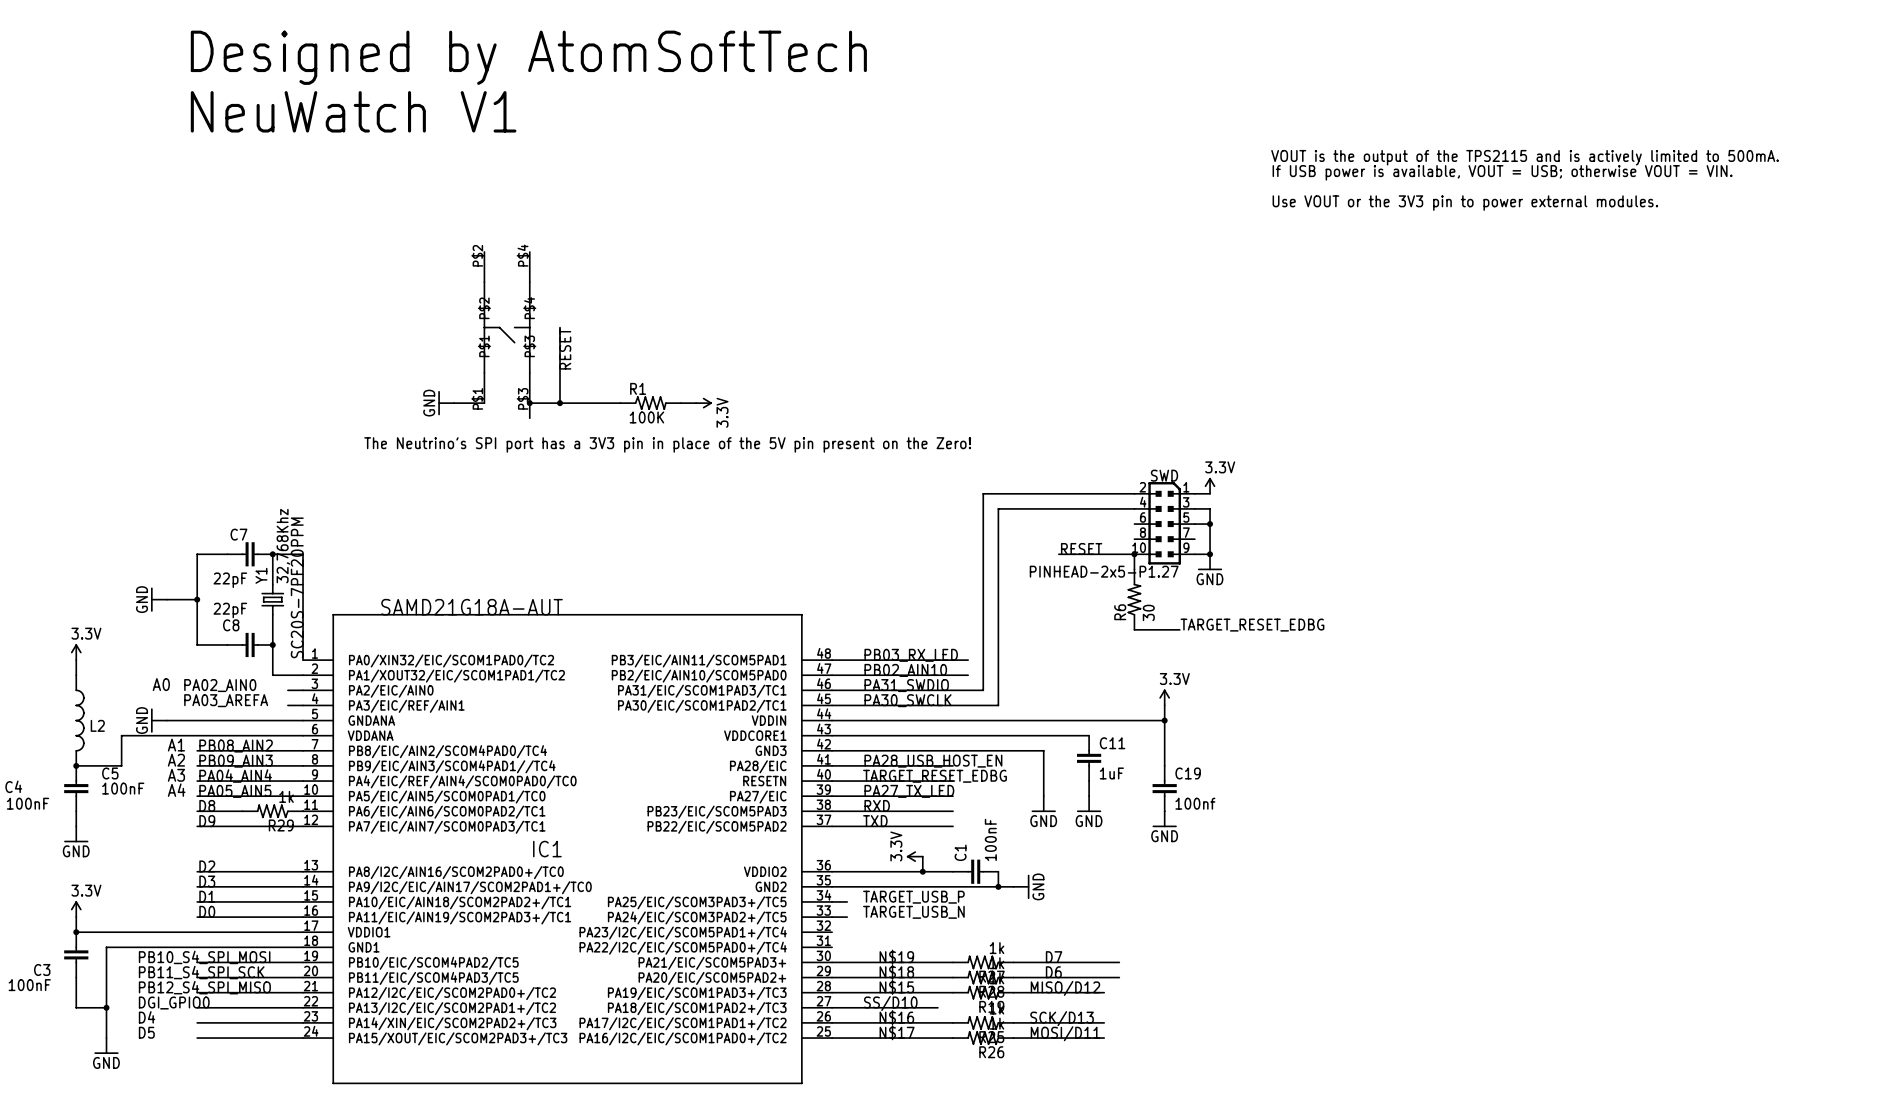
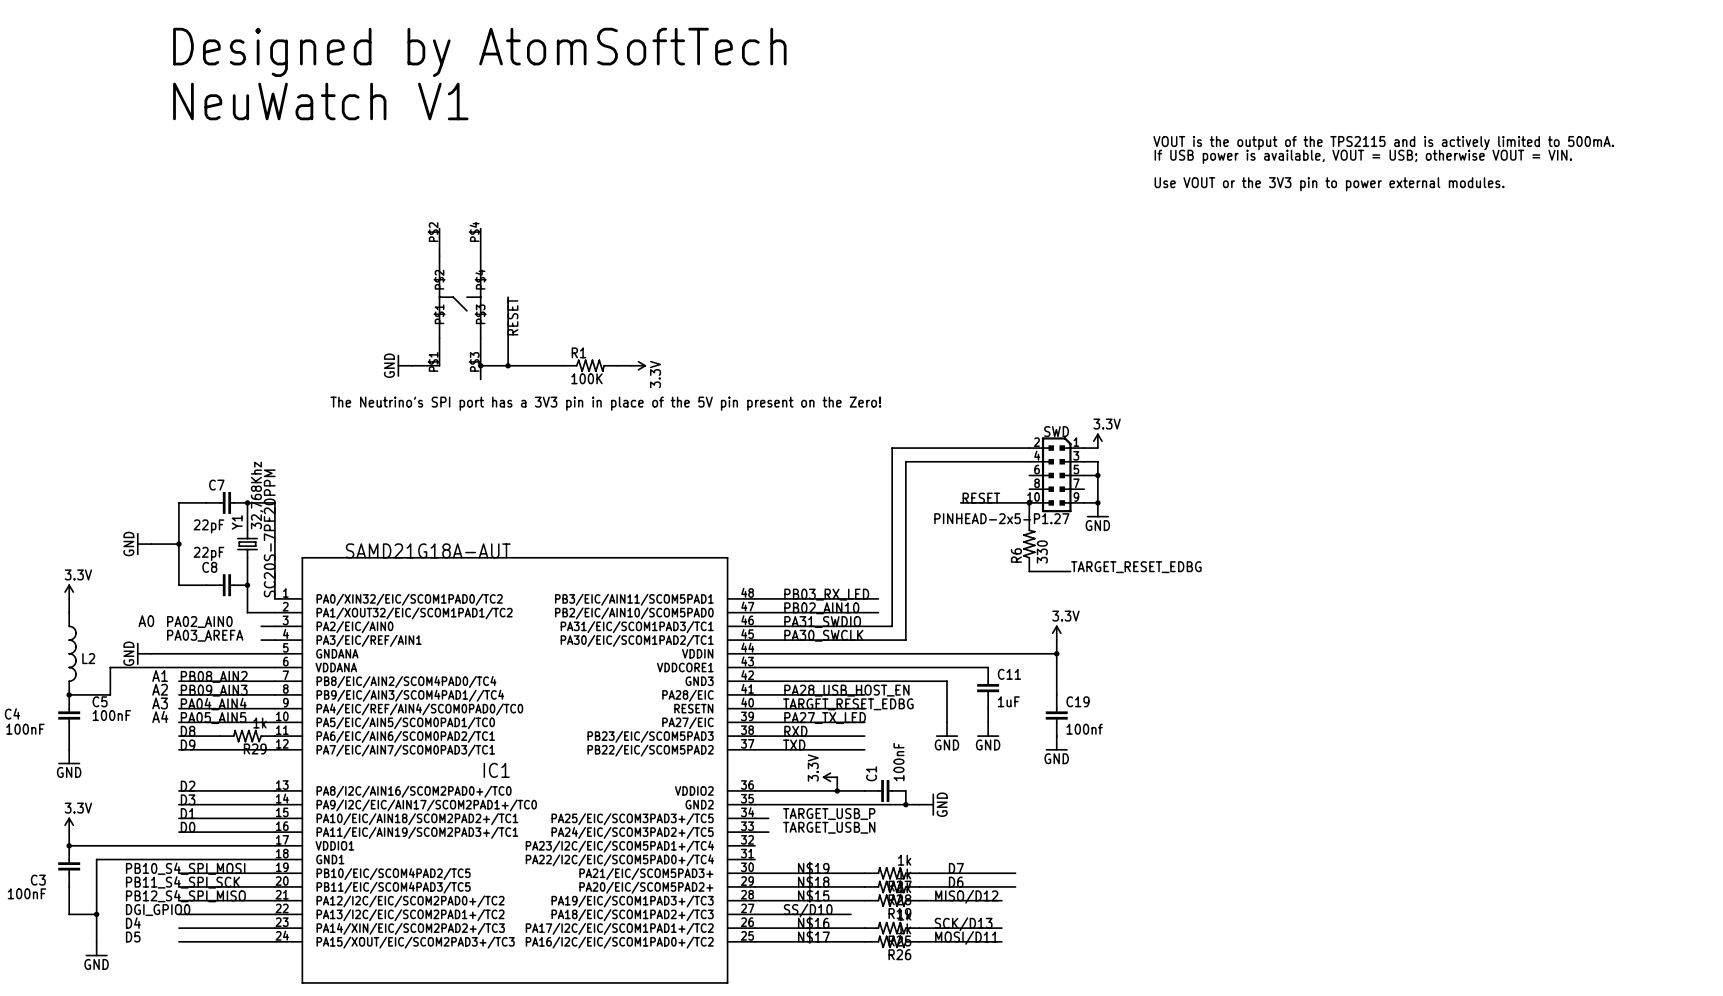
R6 value: 30 (1148, 612) -> 330 (1042, 552)

